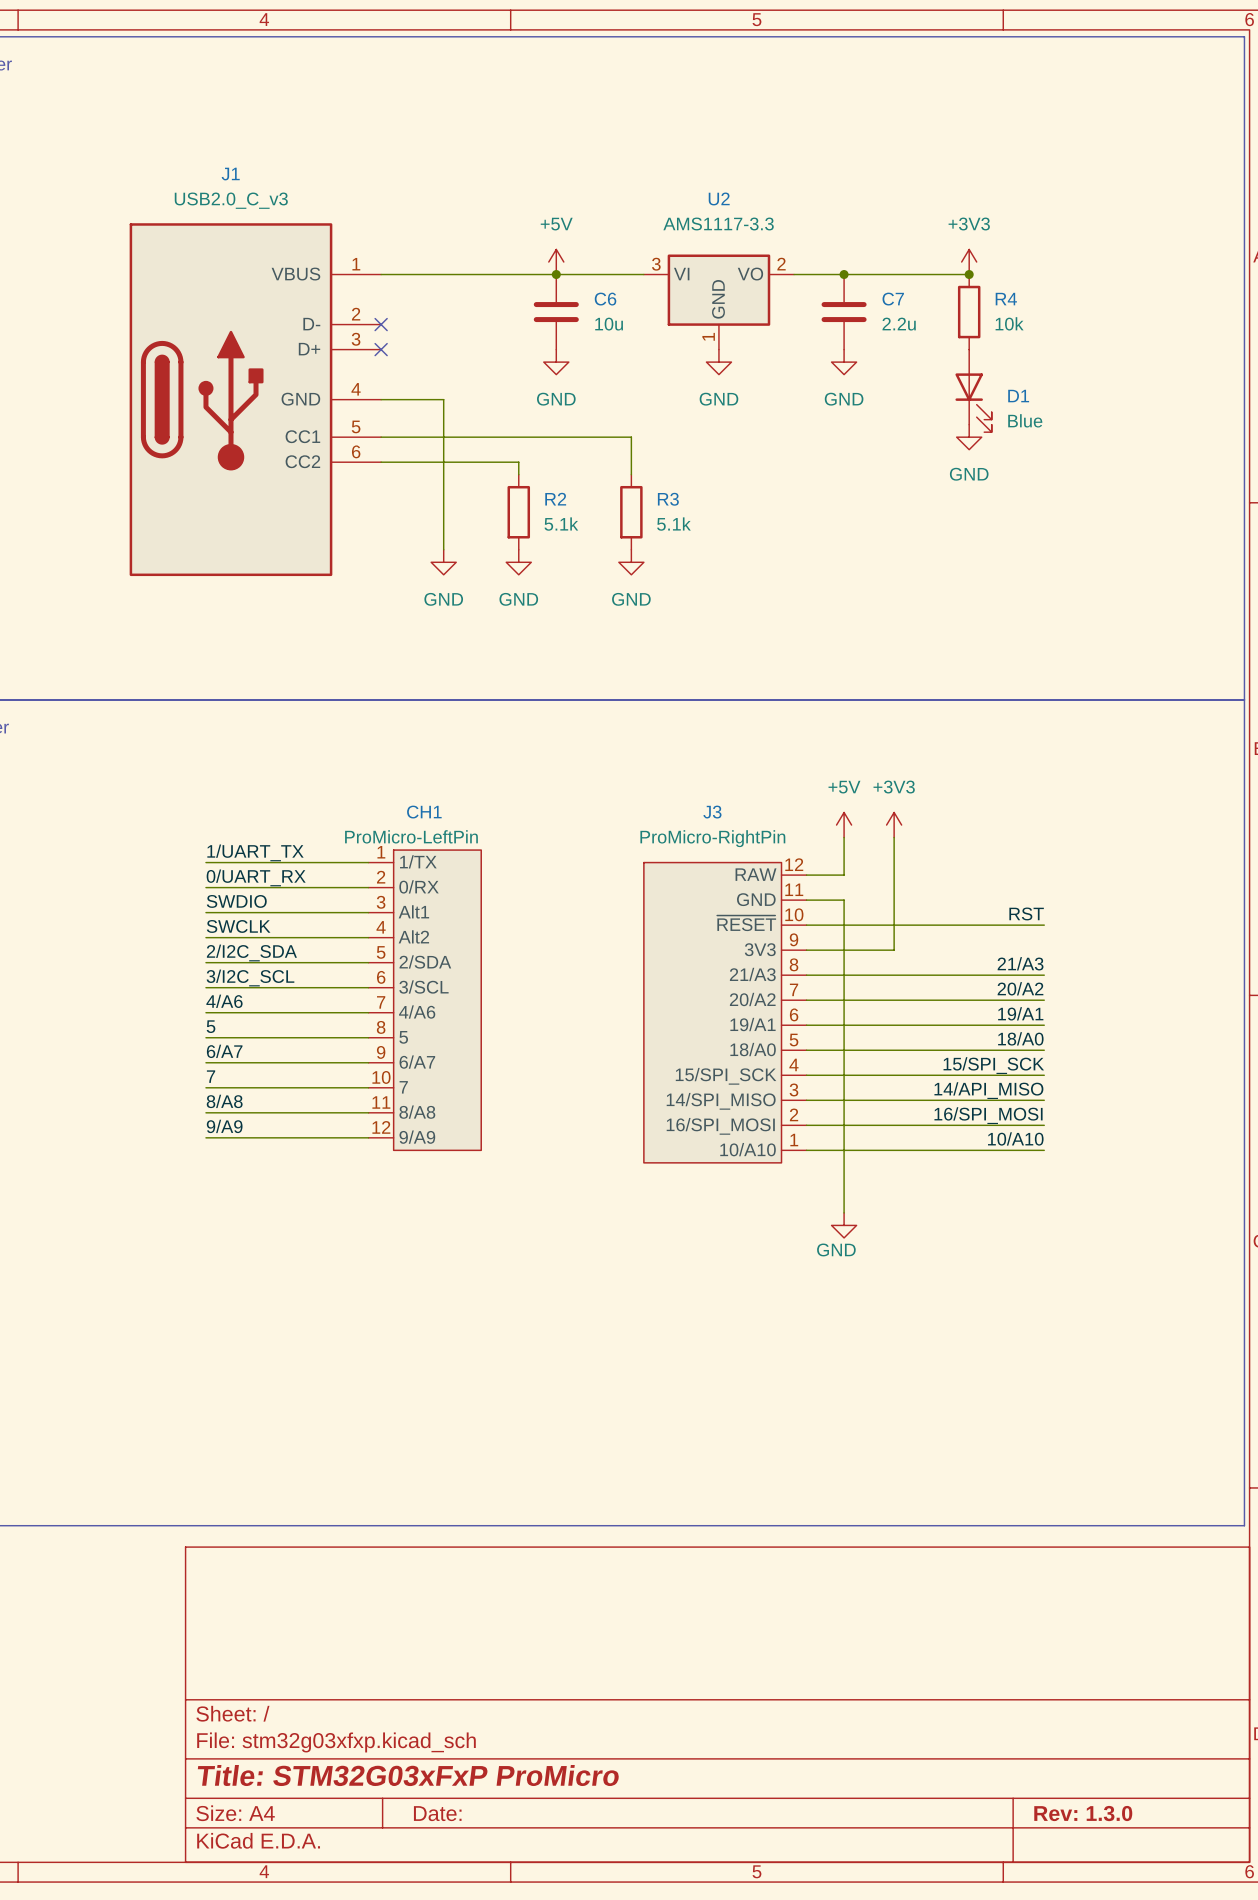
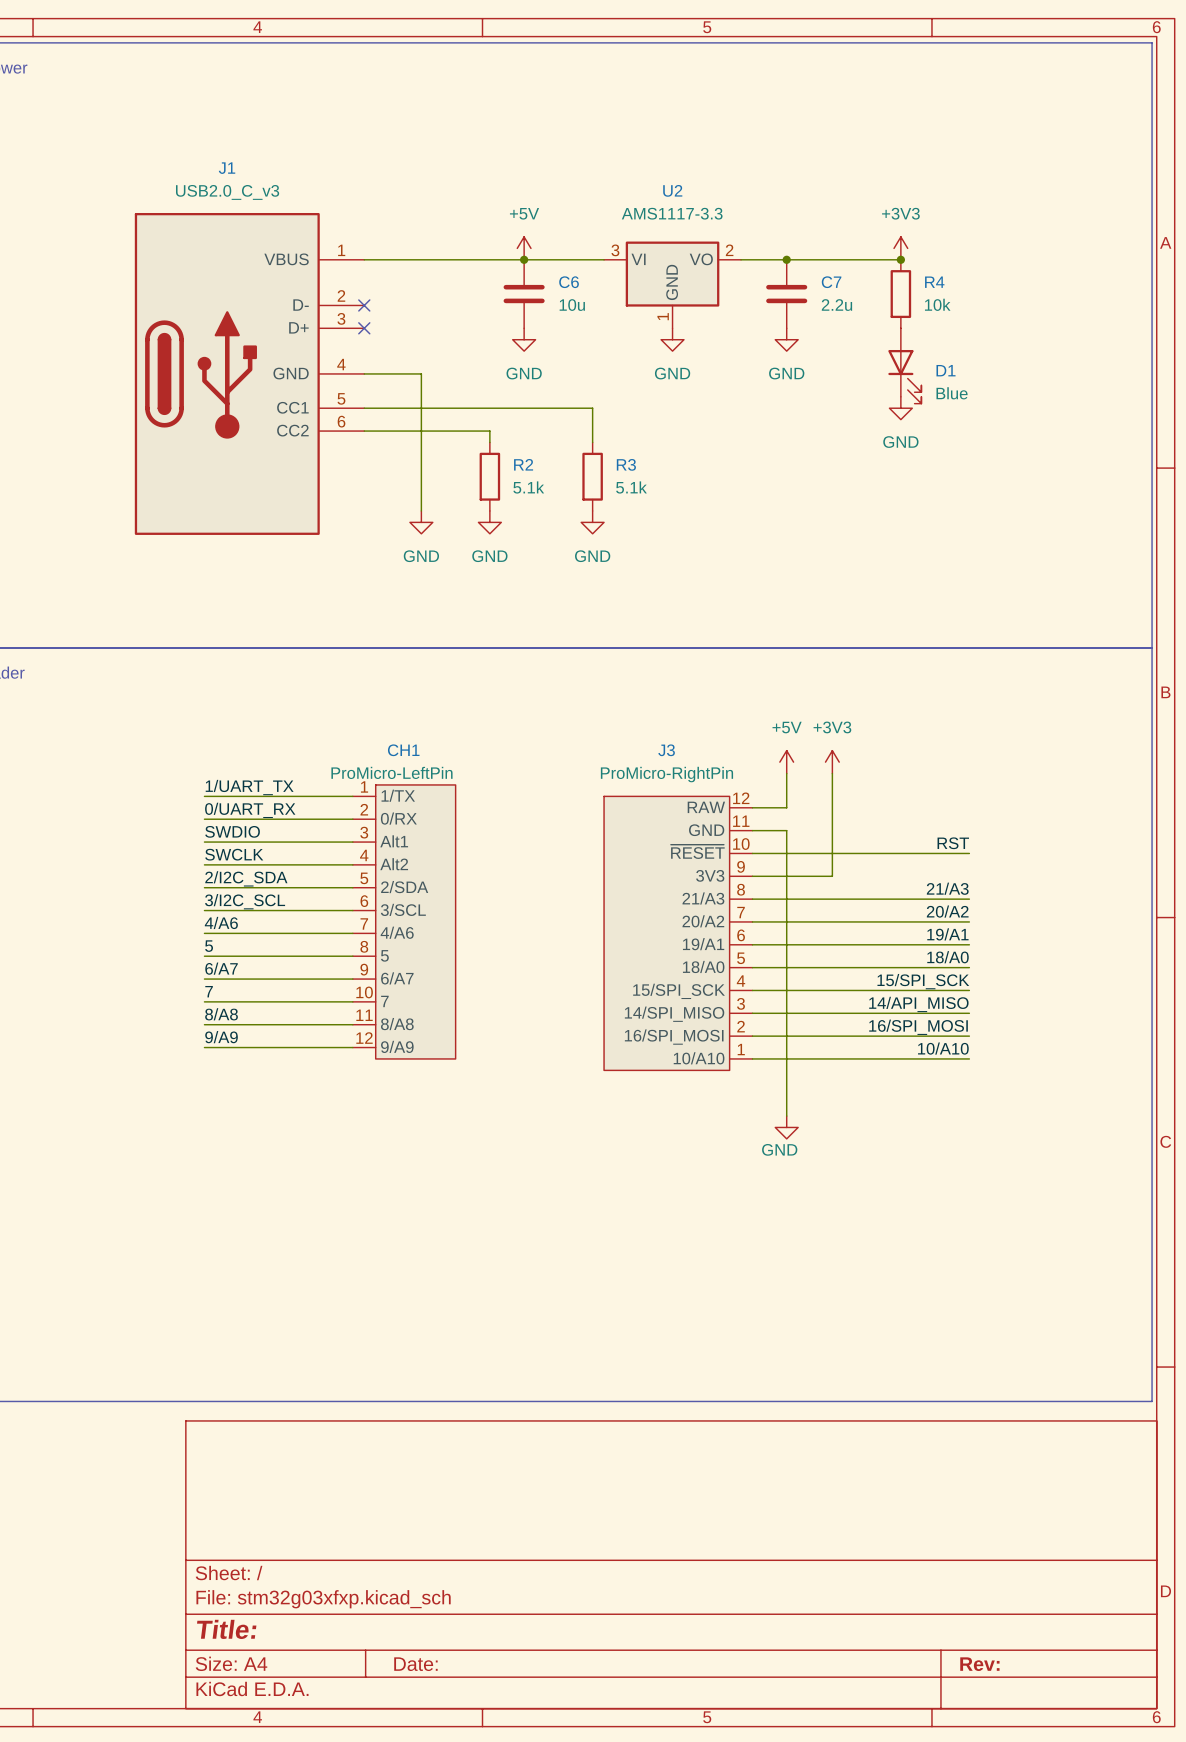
title block: Title: STM32G03xFxP ProMicro (408, 1775) -> Title: (226, 1629)
title block: Rev: 1.3.0 (1083, 1813) -> Rev: (979, 1664)

